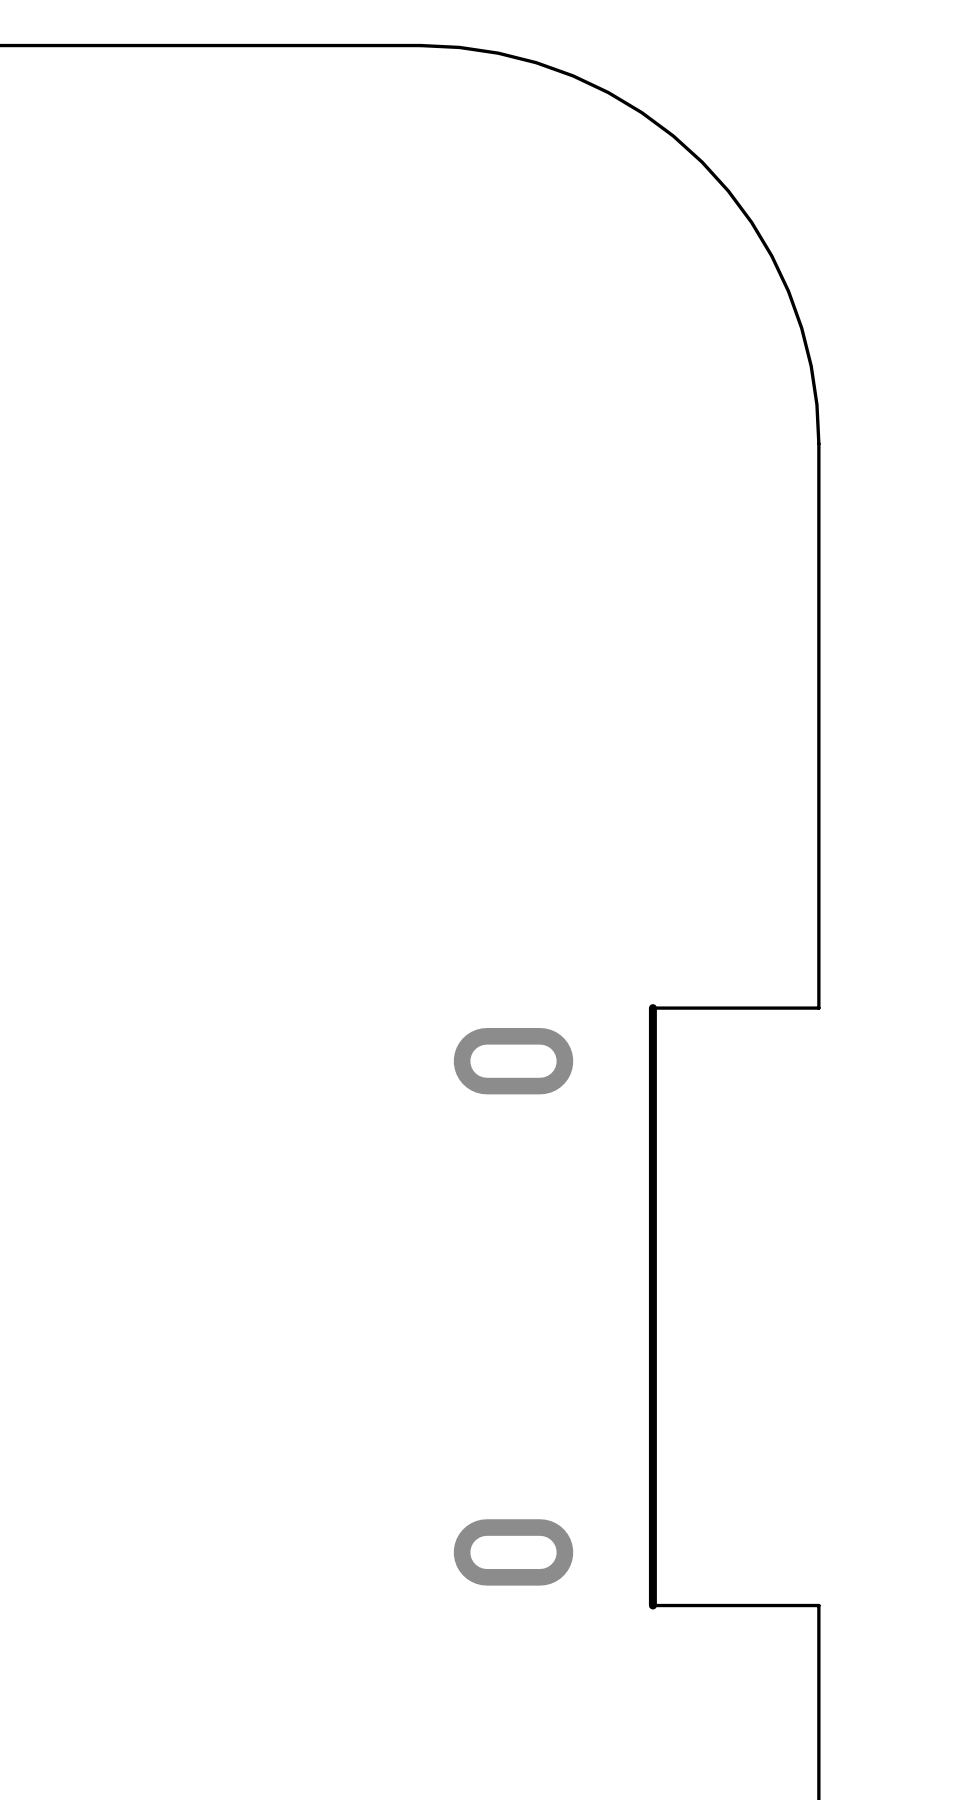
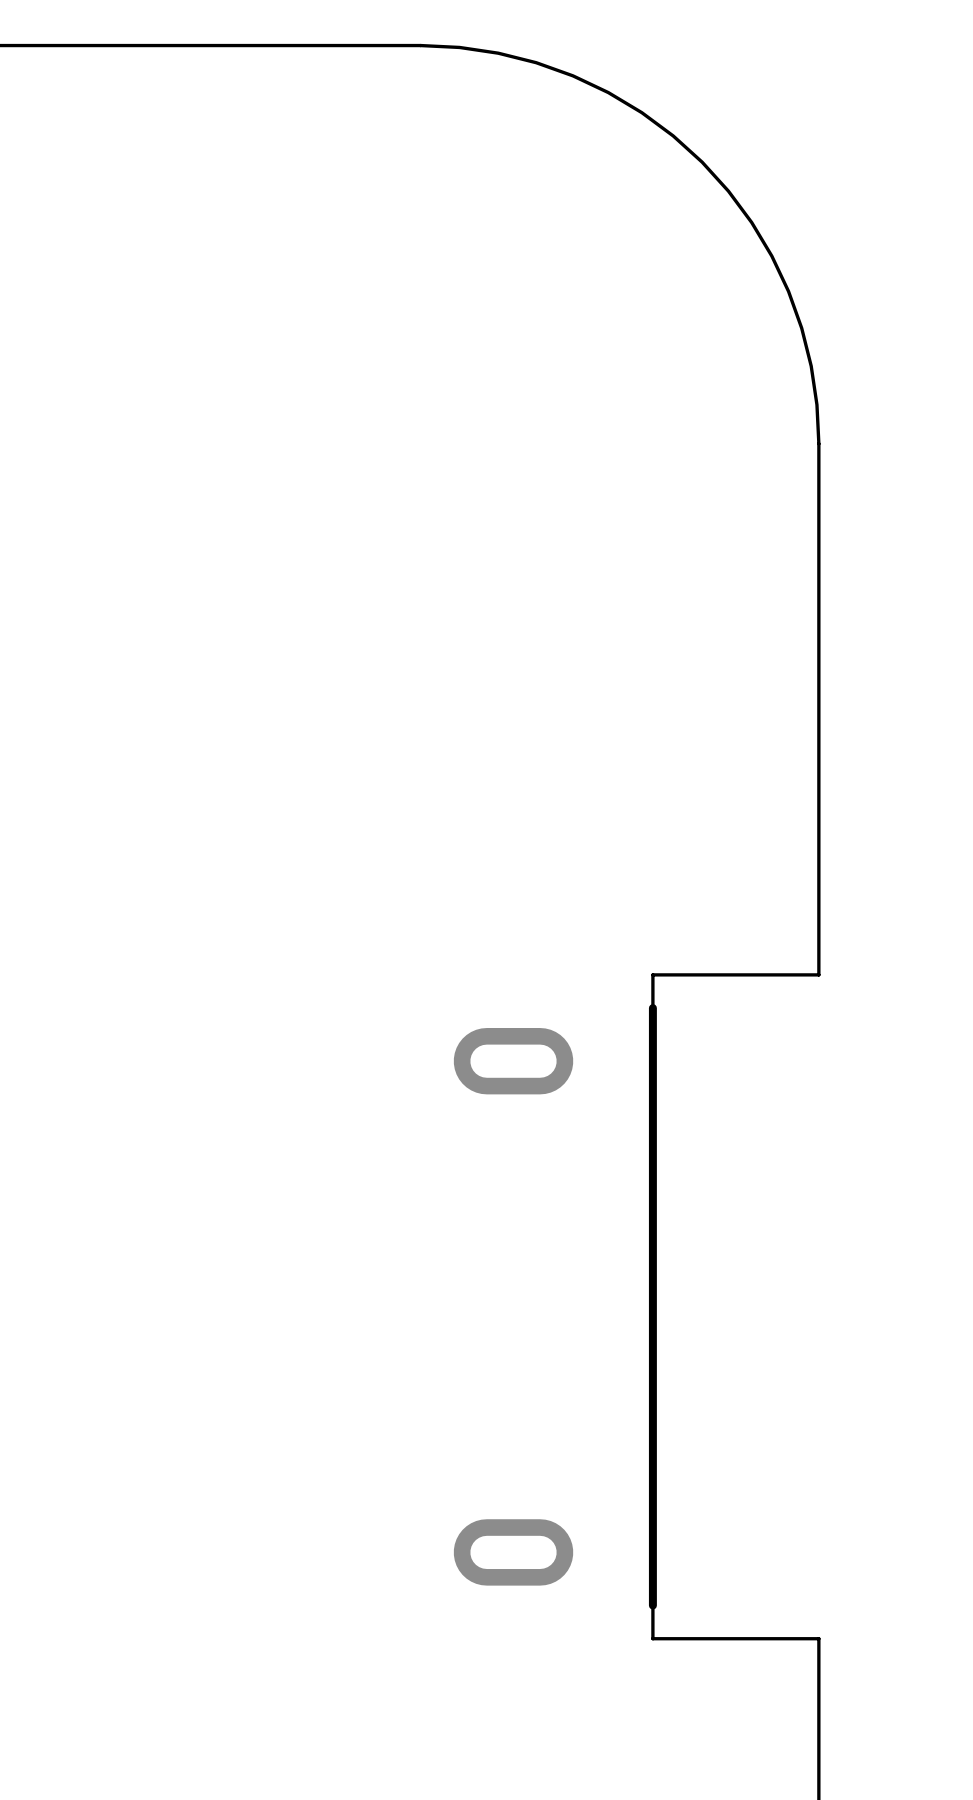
board edge: (818, 974) (818, 1008) (652, 1008) -> (818, 974) (652, 974) (652, 1008)
board edge: (652, 1605) (818, 1605) (818, 1638) -> (652, 1605) (652, 1638) (818, 1638)

